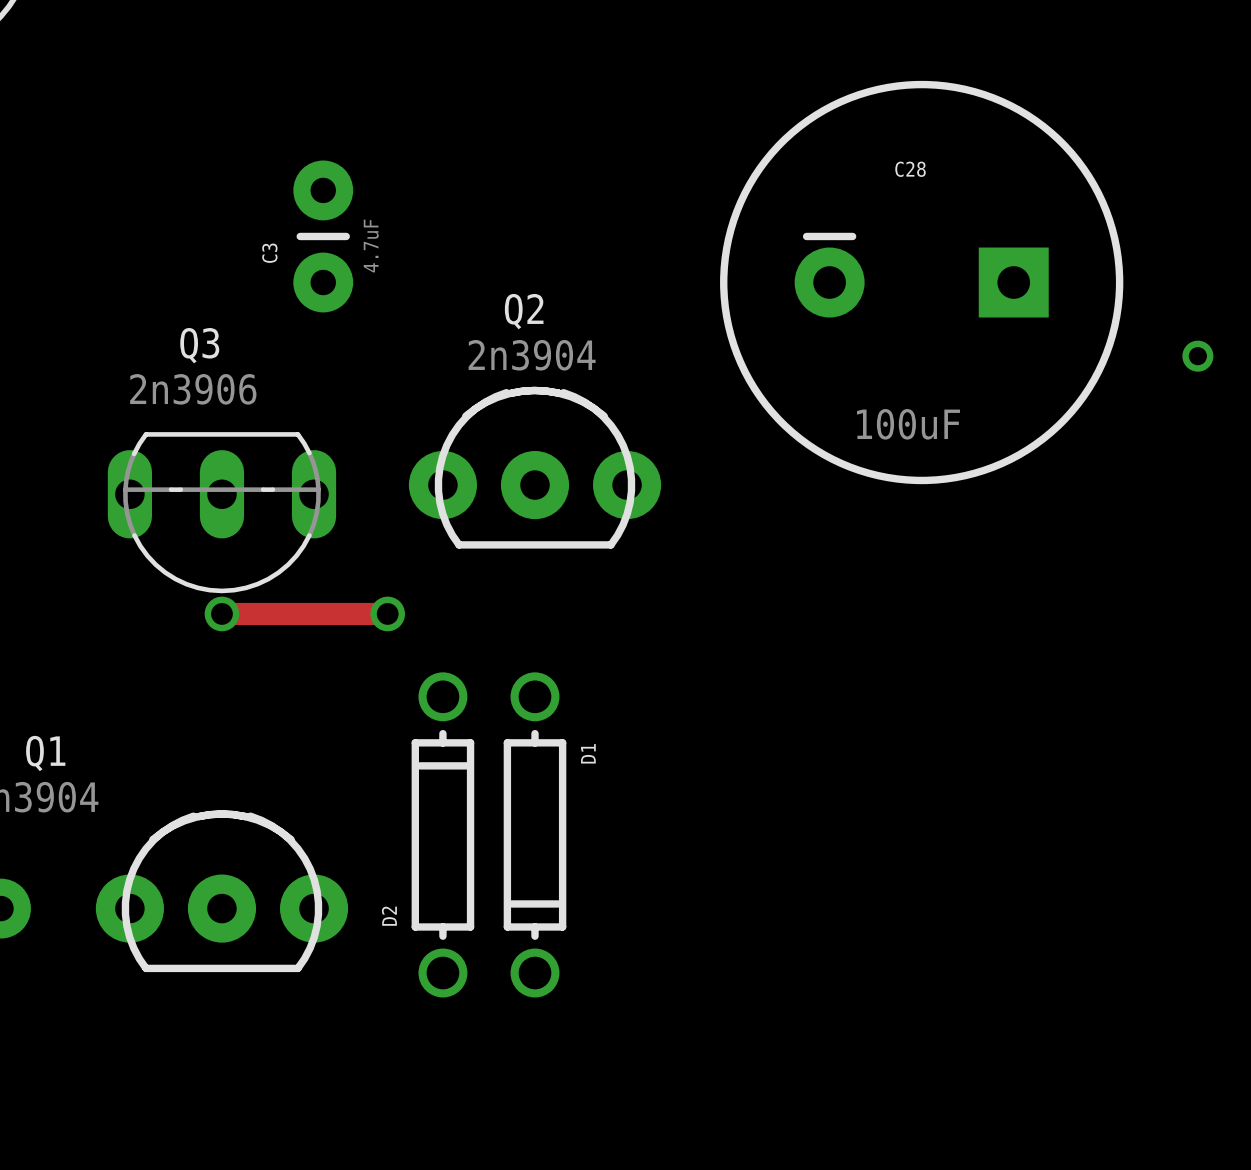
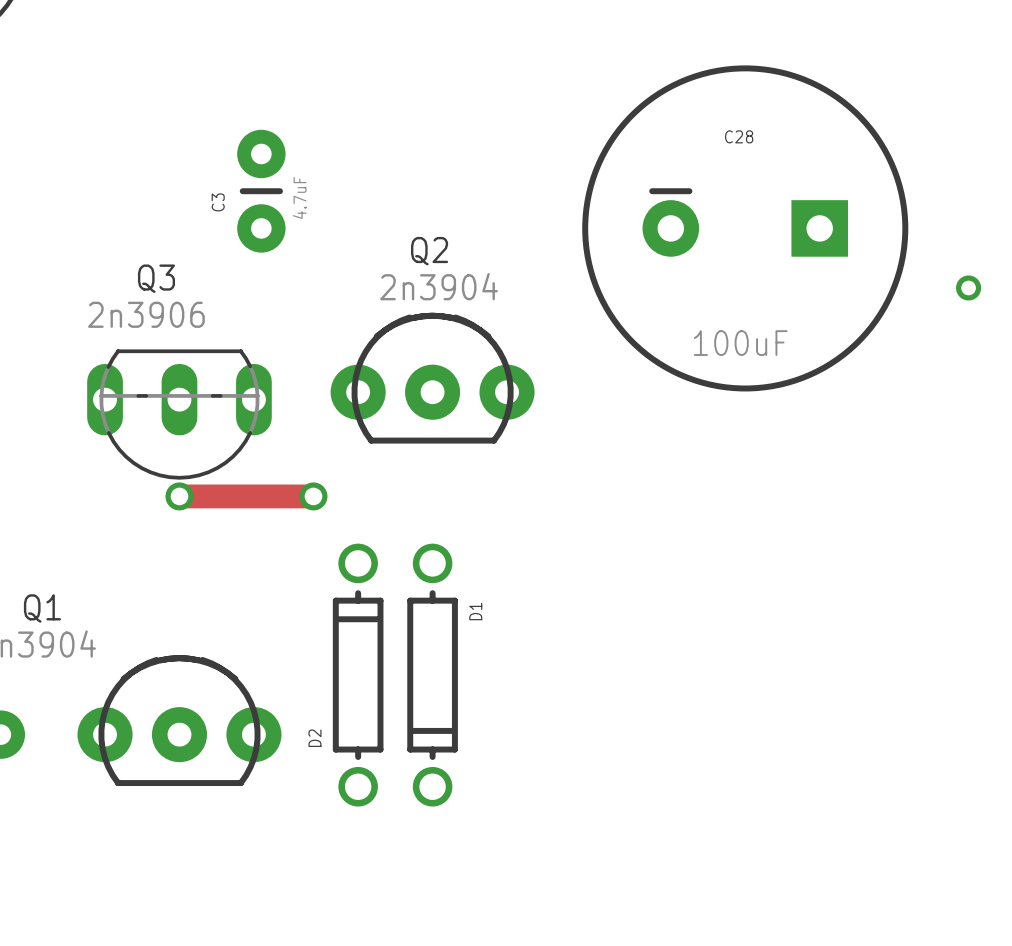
track width: thin (221, 613) (387, 613) -> thick (179, 496) (313, 496)

